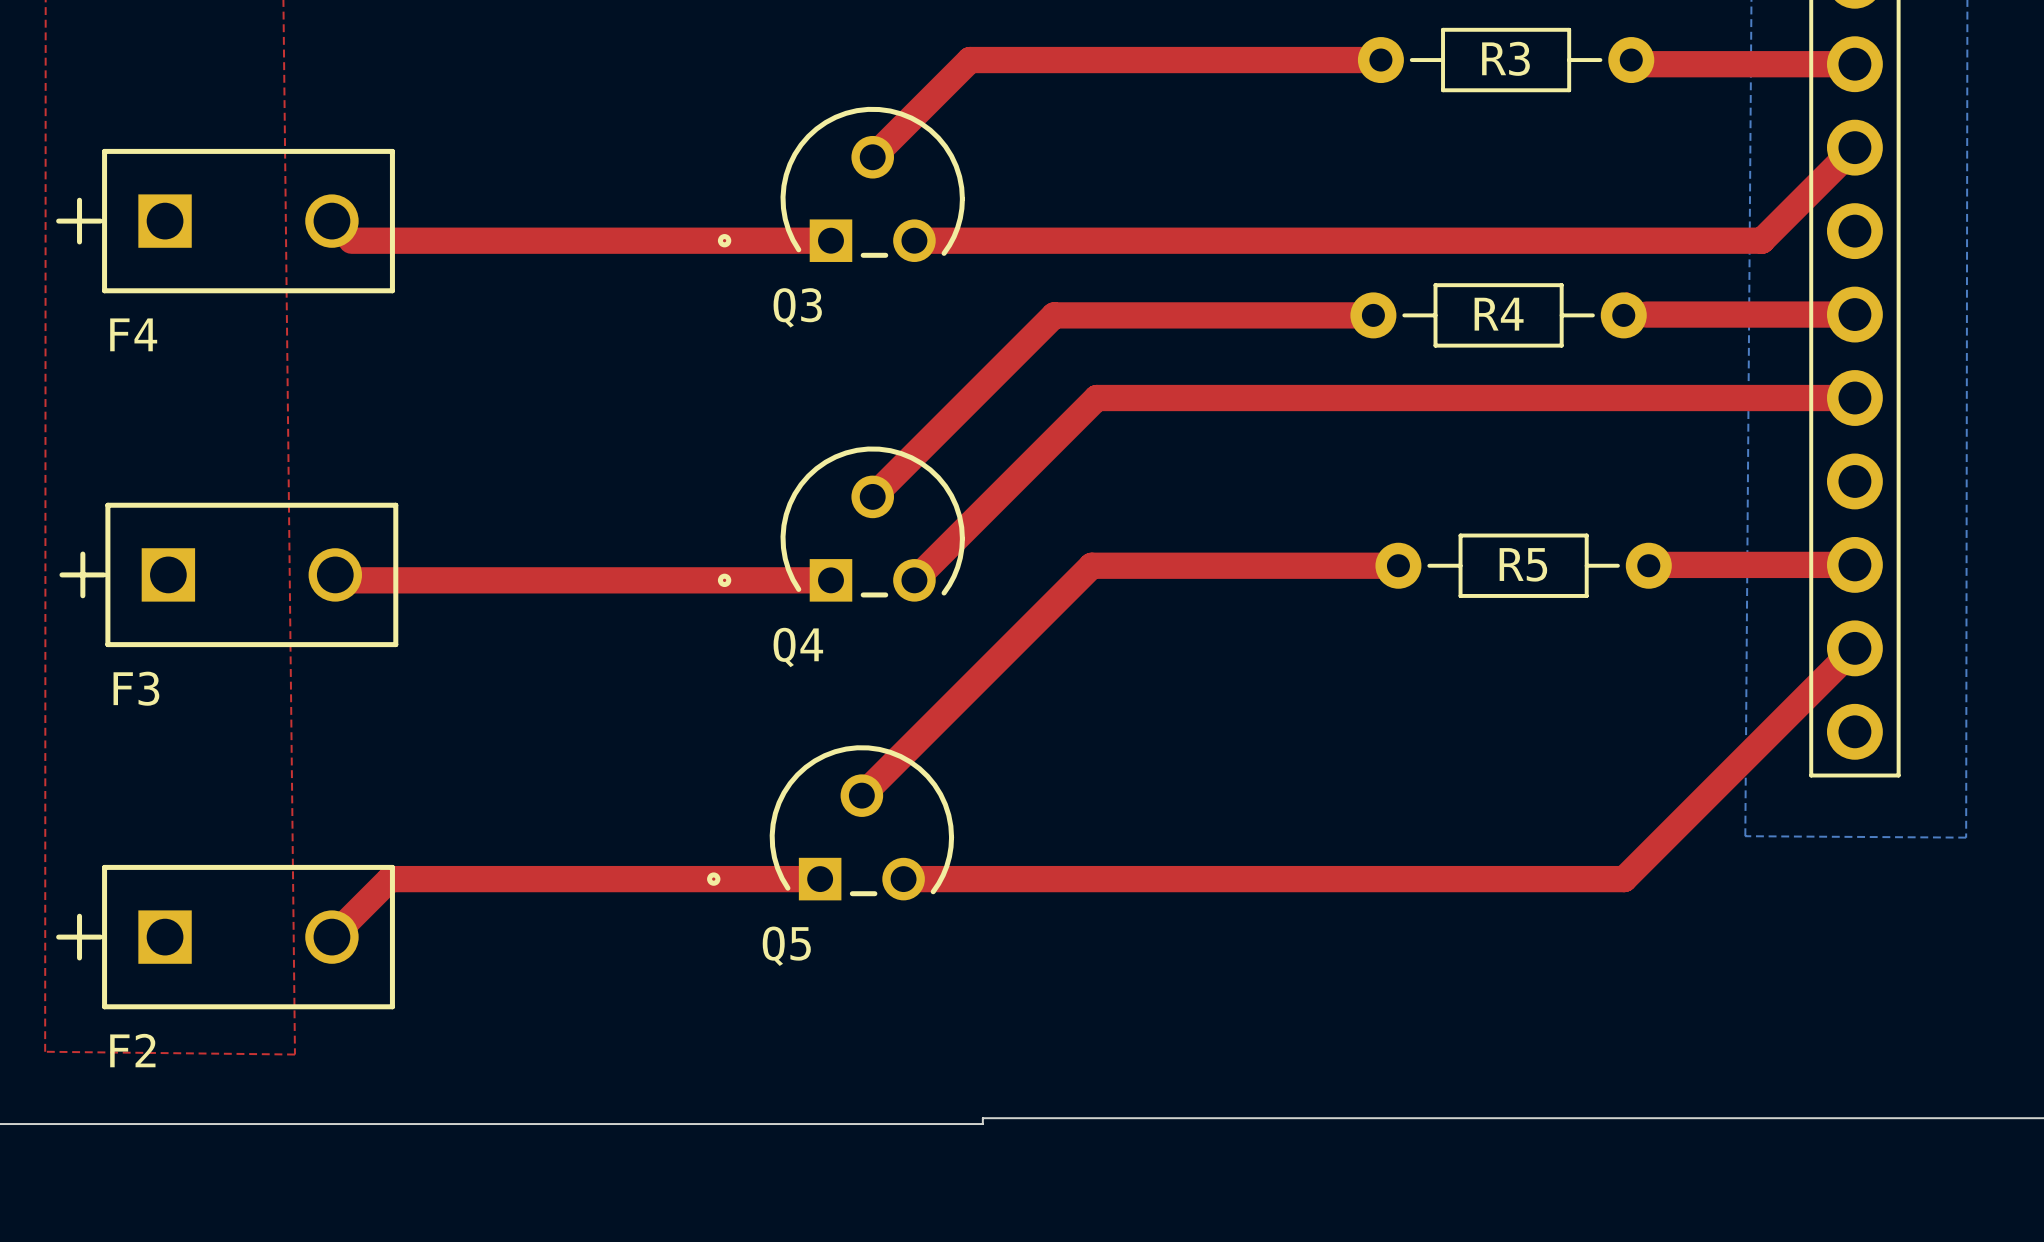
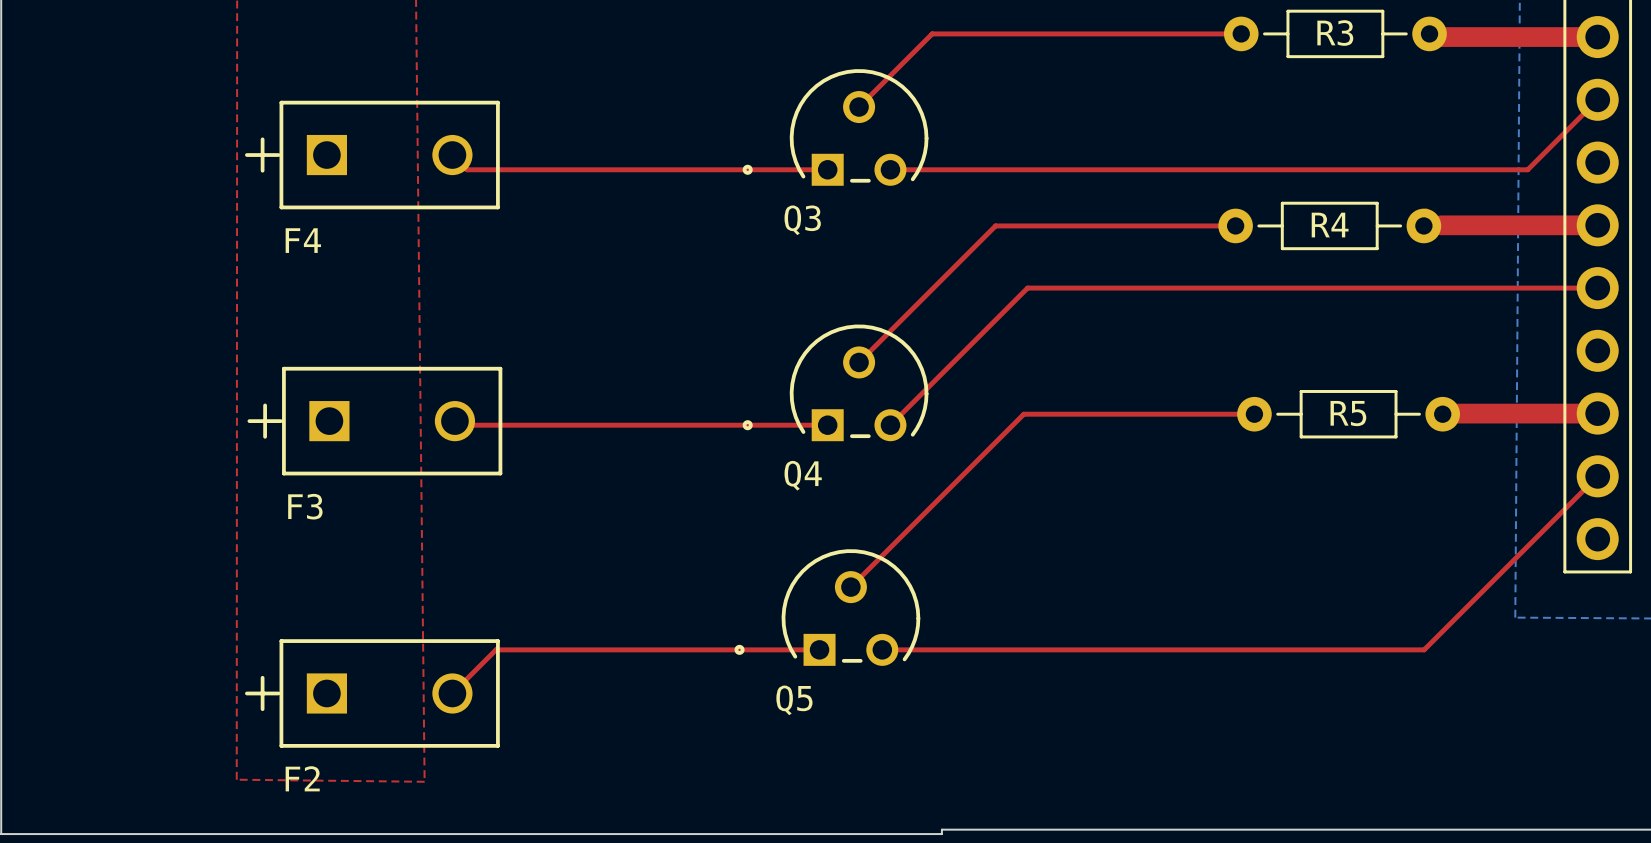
top track width: thick (1380, 60) (969, 60) (872, 157) -> thin (1241, 33) (932, 33) (859, 107)
top track width: thick (1854, 147) (1761, 240) (914, 240) -> thin (1597, 99) (1527, 169) (890, 169)
top track width: thick (351, 240) (830, 240) -> thin (467, 169) (827, 169)
top track width: thick (1373, 315) (1054, 315) (872, 496) -> thin (1235, 225) (995, 225) (859, 362)
top track width: thick (1854, 398) (1096, 398) (914, 580) -> thin (1597, 288) (1027, 288) (890, 425)
top track width: thick (1398, 565) (1091, 565) (861, 795) -> thin (1254, 414) (1023, 414) (850, 587)
top track width: thick (340, 580) (830, 580) -> thin (459, 425) (827, 425)
top track width: thick (1854, 648) (1624, 879) (903, 879) -> thin (1597, 476) (1424, 649) (882, 649)
top track width: thick (820, 879) (389, 879) (331, 937) -> thin (819, 649) (496, 649) (452, 693)

